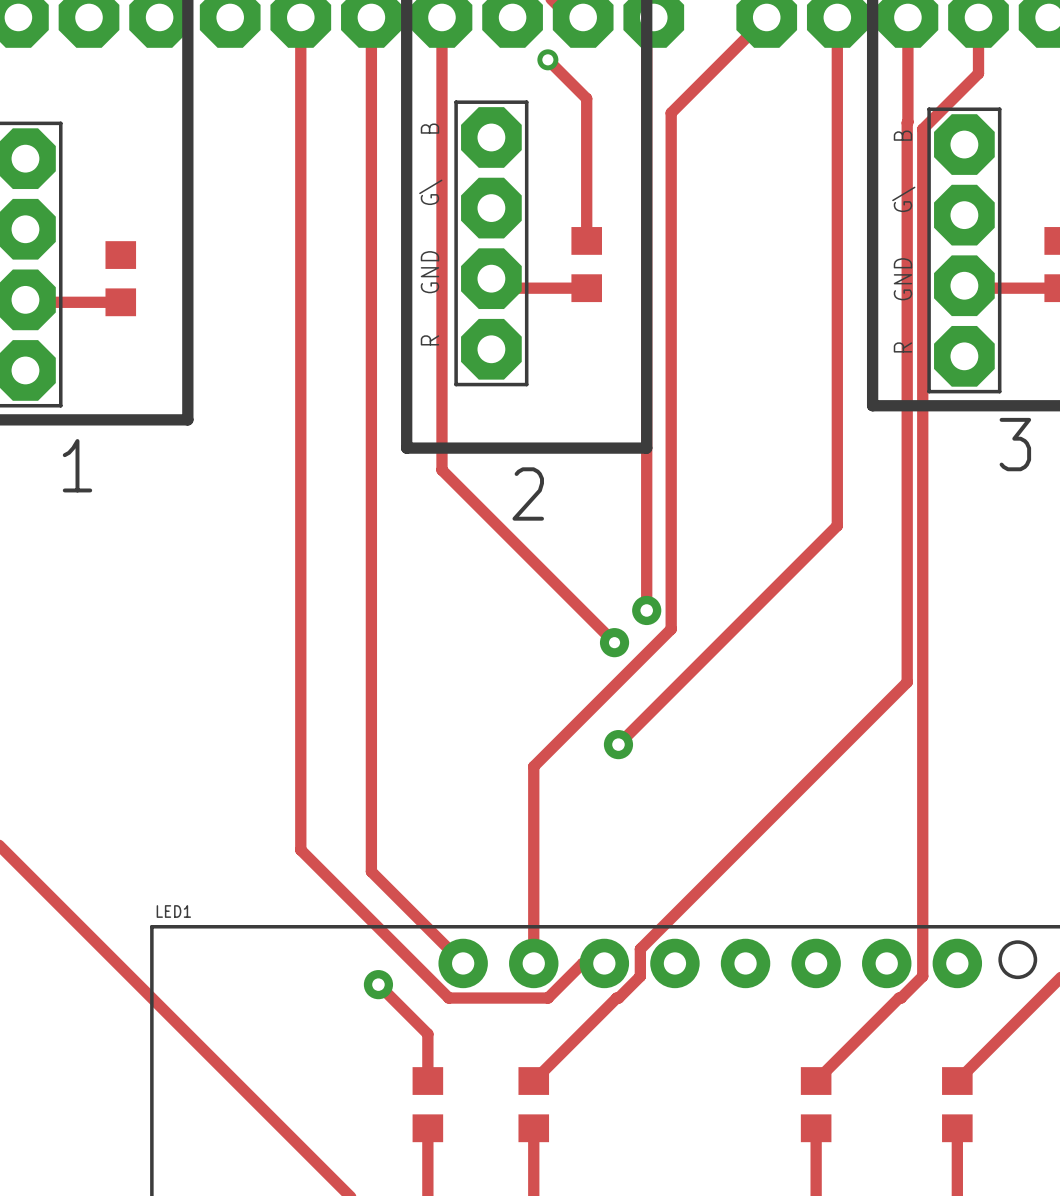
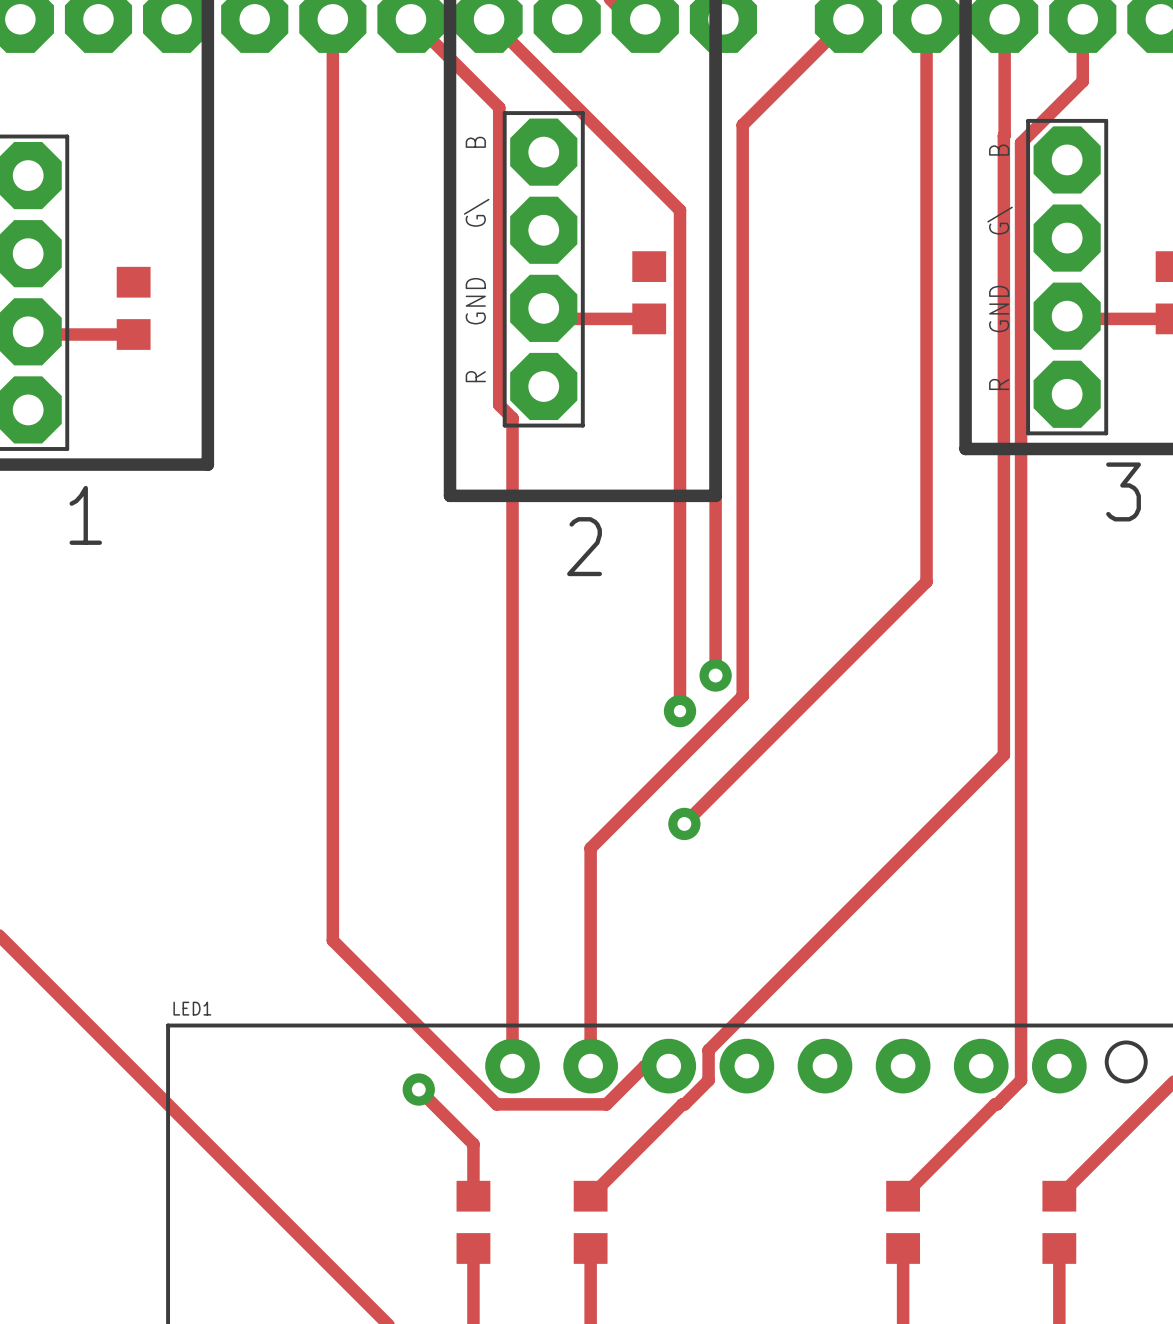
track: (371, 17) (371, 871) (463, 963) -> (410, 19) (499, 107) (499, 404) (512, 418) (512, 1066)
track: (441, 17) (441, 470) (614, 642) -> (489, 19) (680, 210) (680, 711)
track: (547, 59) (586, 98) (586, 240) -> none
via: (547, 59) -> none

